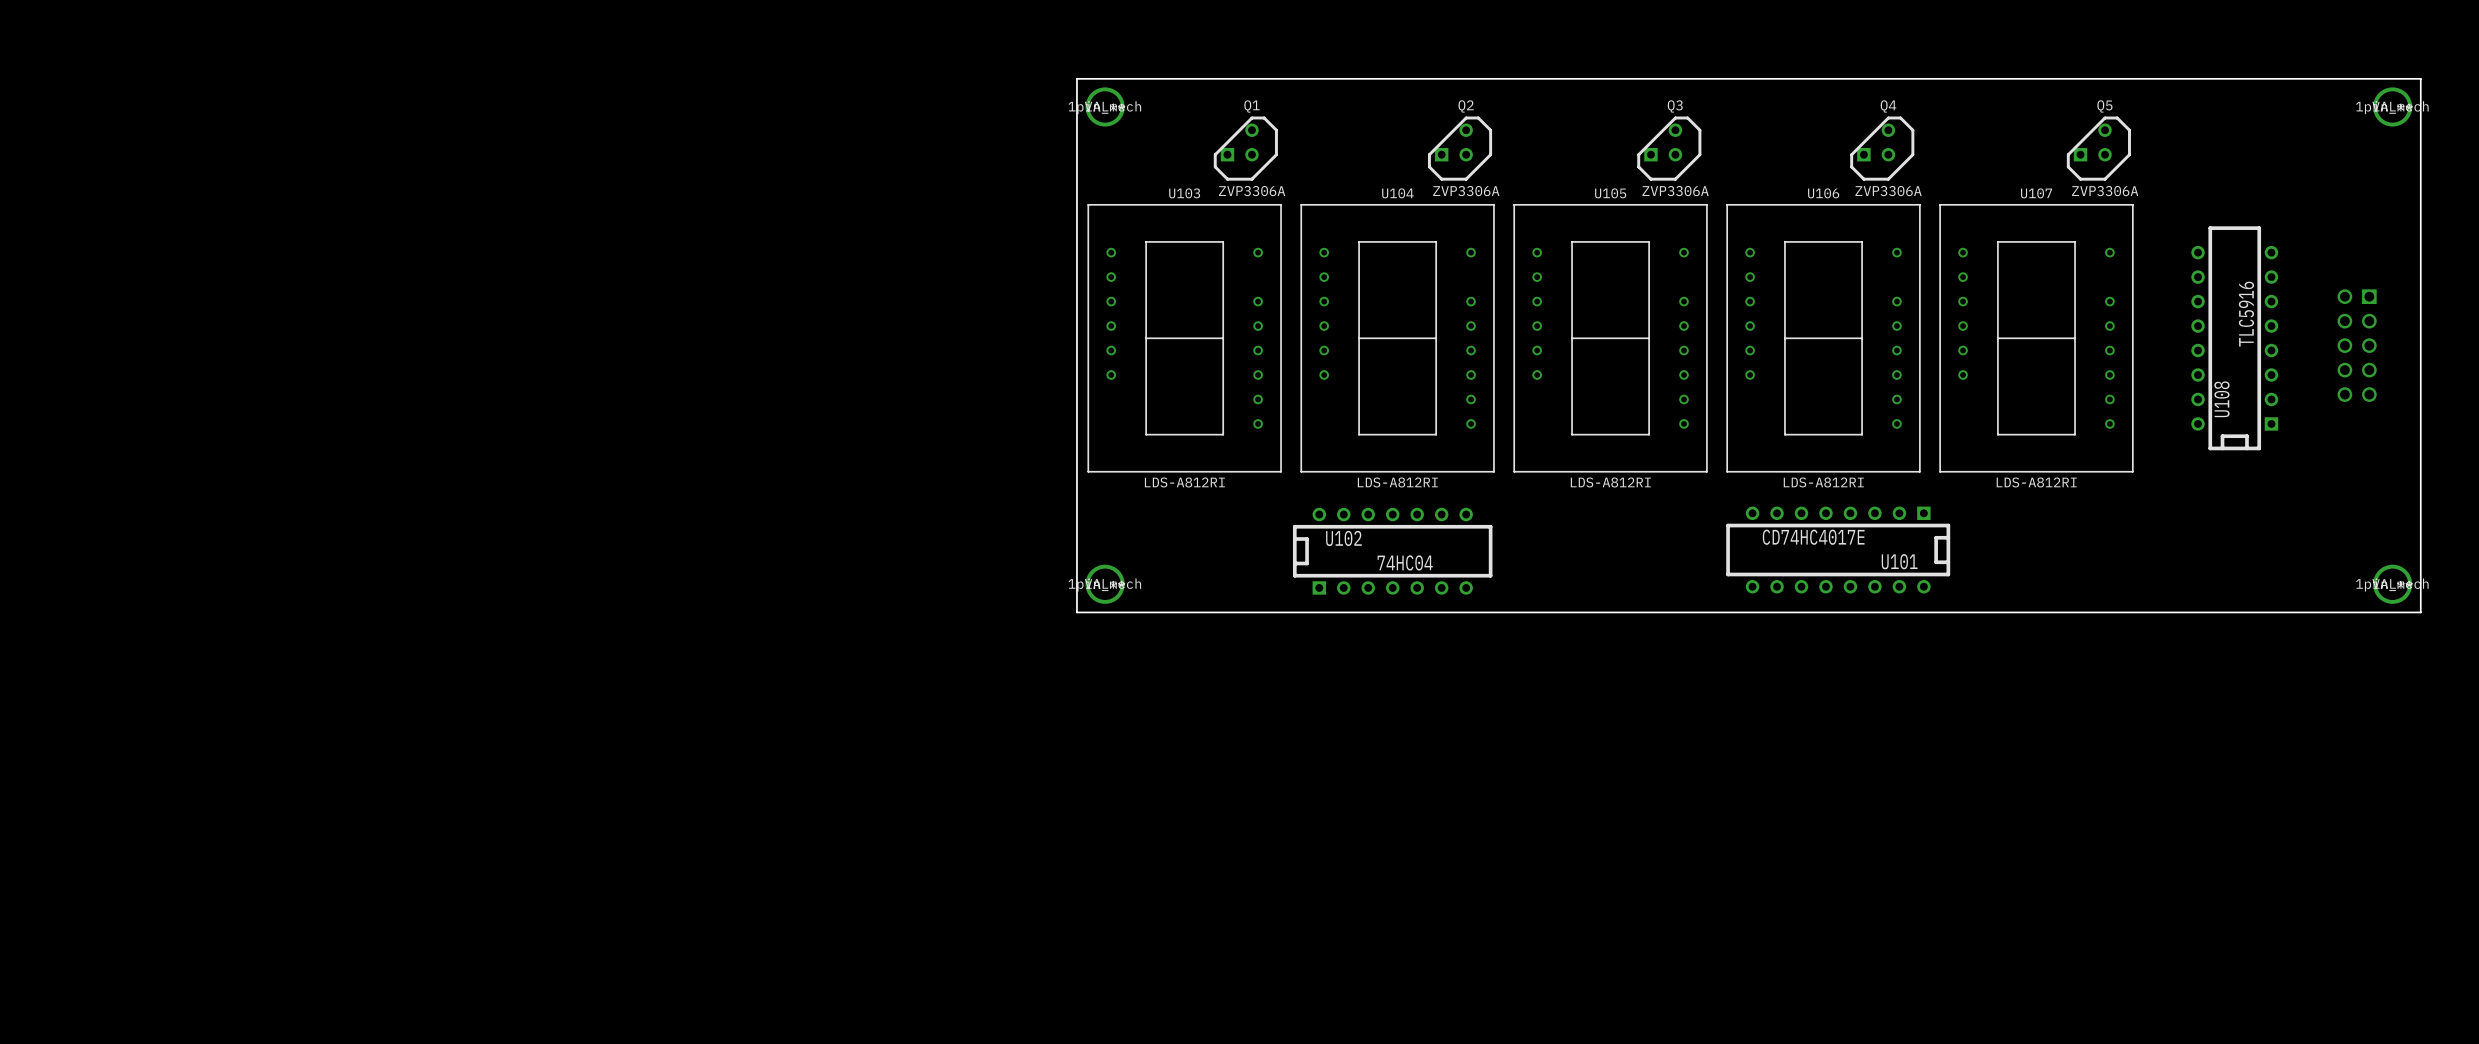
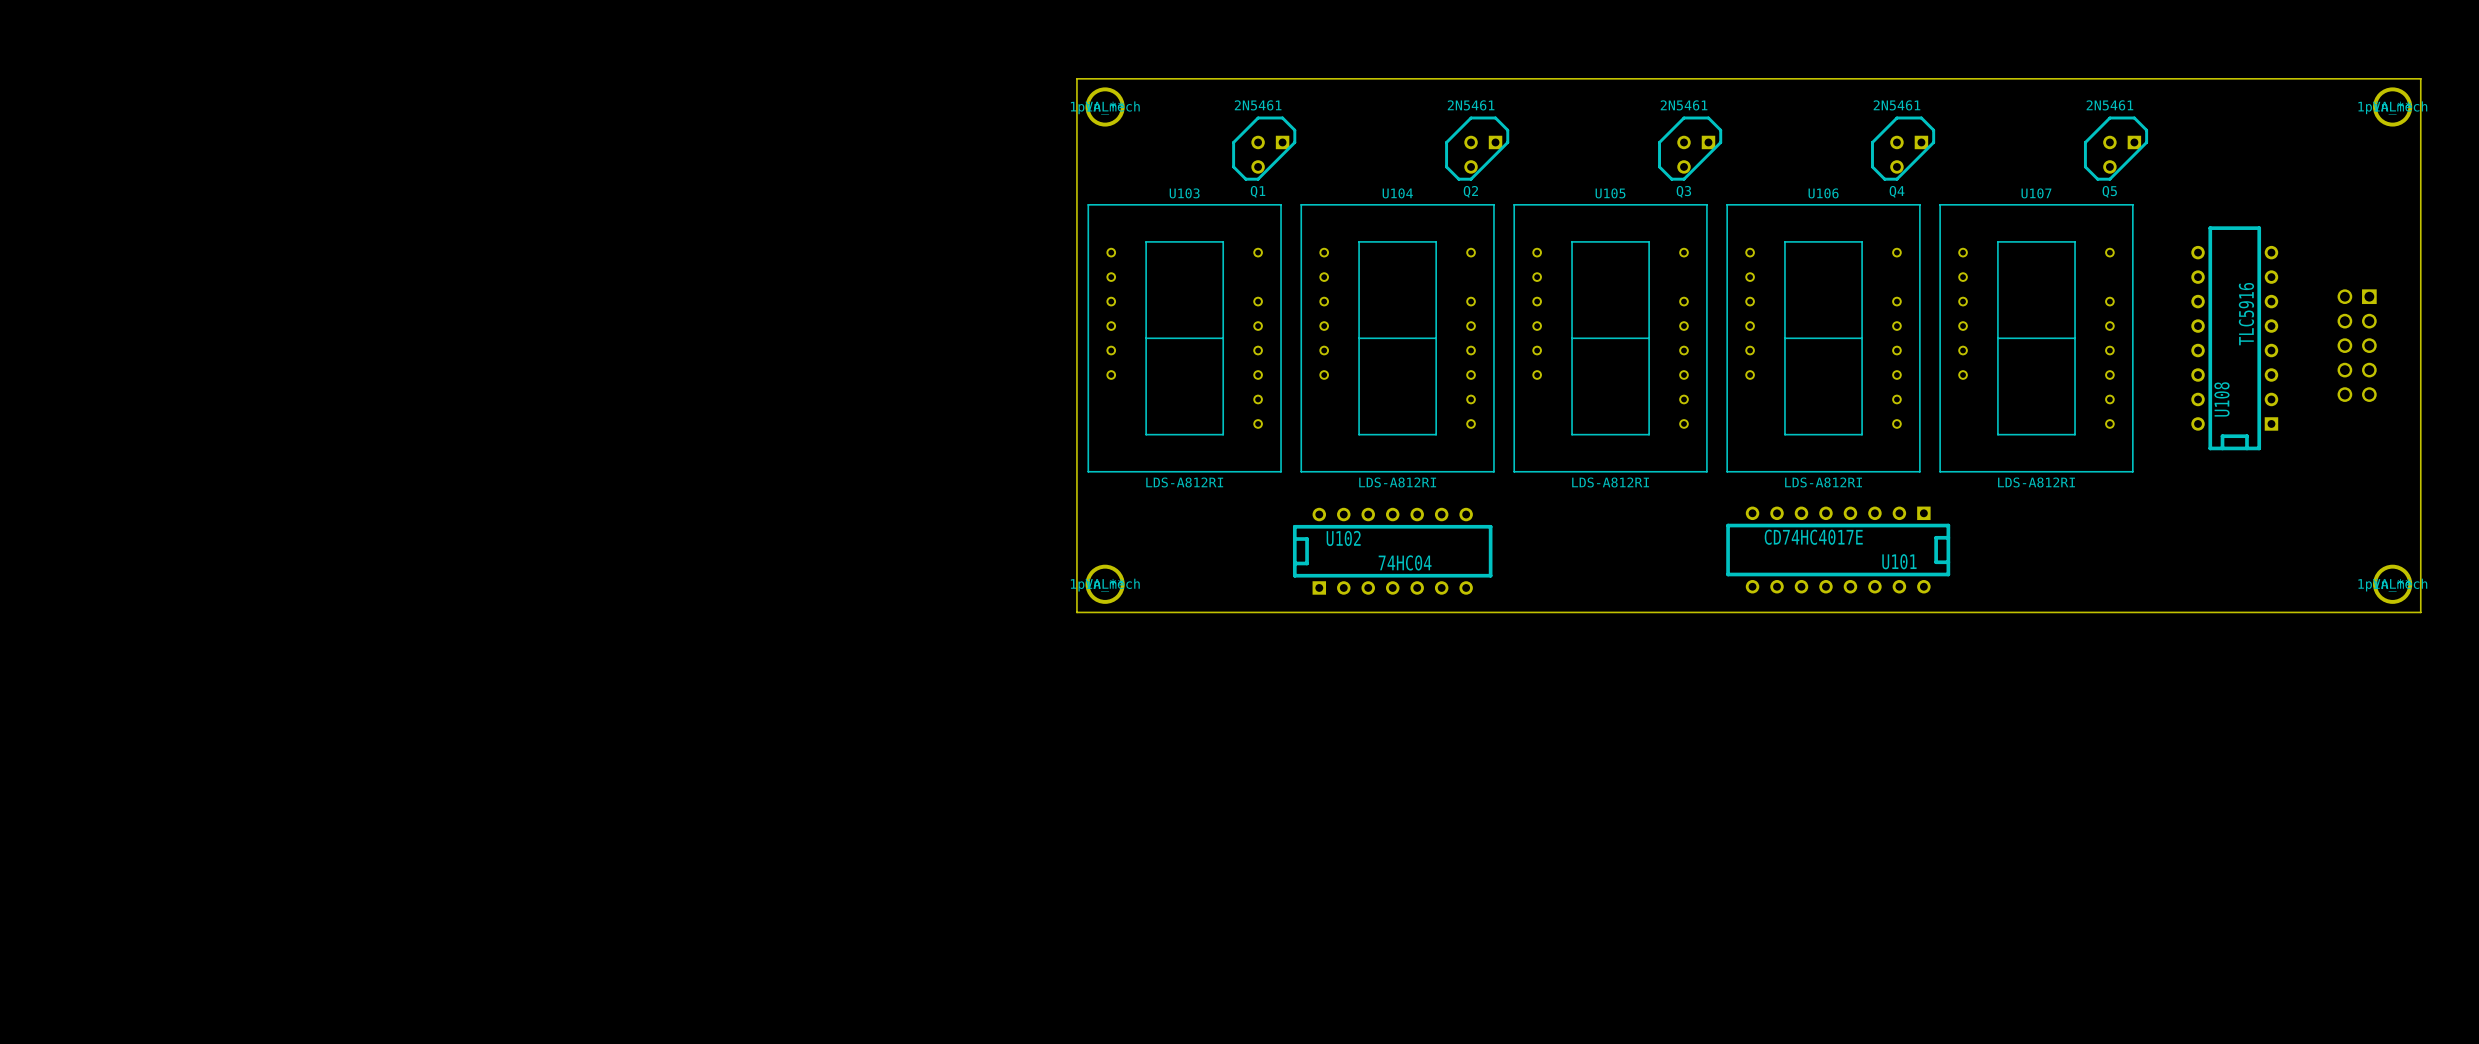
Q1 rotation: 0° (1245, 148) -> 180° (1264, 148)
Q2 rotation: 0° (1460, 148) -> 180° (1477, 148)
Q3 rotation: 0° (1669, 148) -> 180° (1690, 148)
Q4 rotation: 0° (1882, 148) -> 180° (1903, 148)
Q5 rotation: 0° (2098, 148) -> 180° (2116, 148)
Q1 value: ZVP3306A (1252, 191) -> 2N5461 (1258, 105)
Q2 value: ZVP3306A (1466, 191) -> 2N5461 (1471, 105)
Q3 value: ZVP3306A (1675, 191) -> 2N5461 (1684, 105)
Q4 value: ZVP3306A (1888, 191) -> 2N5461 (1896, 105)
Q5 value: ZVP3306A (2105, 191) -> 2N5461 (2109, 105)

